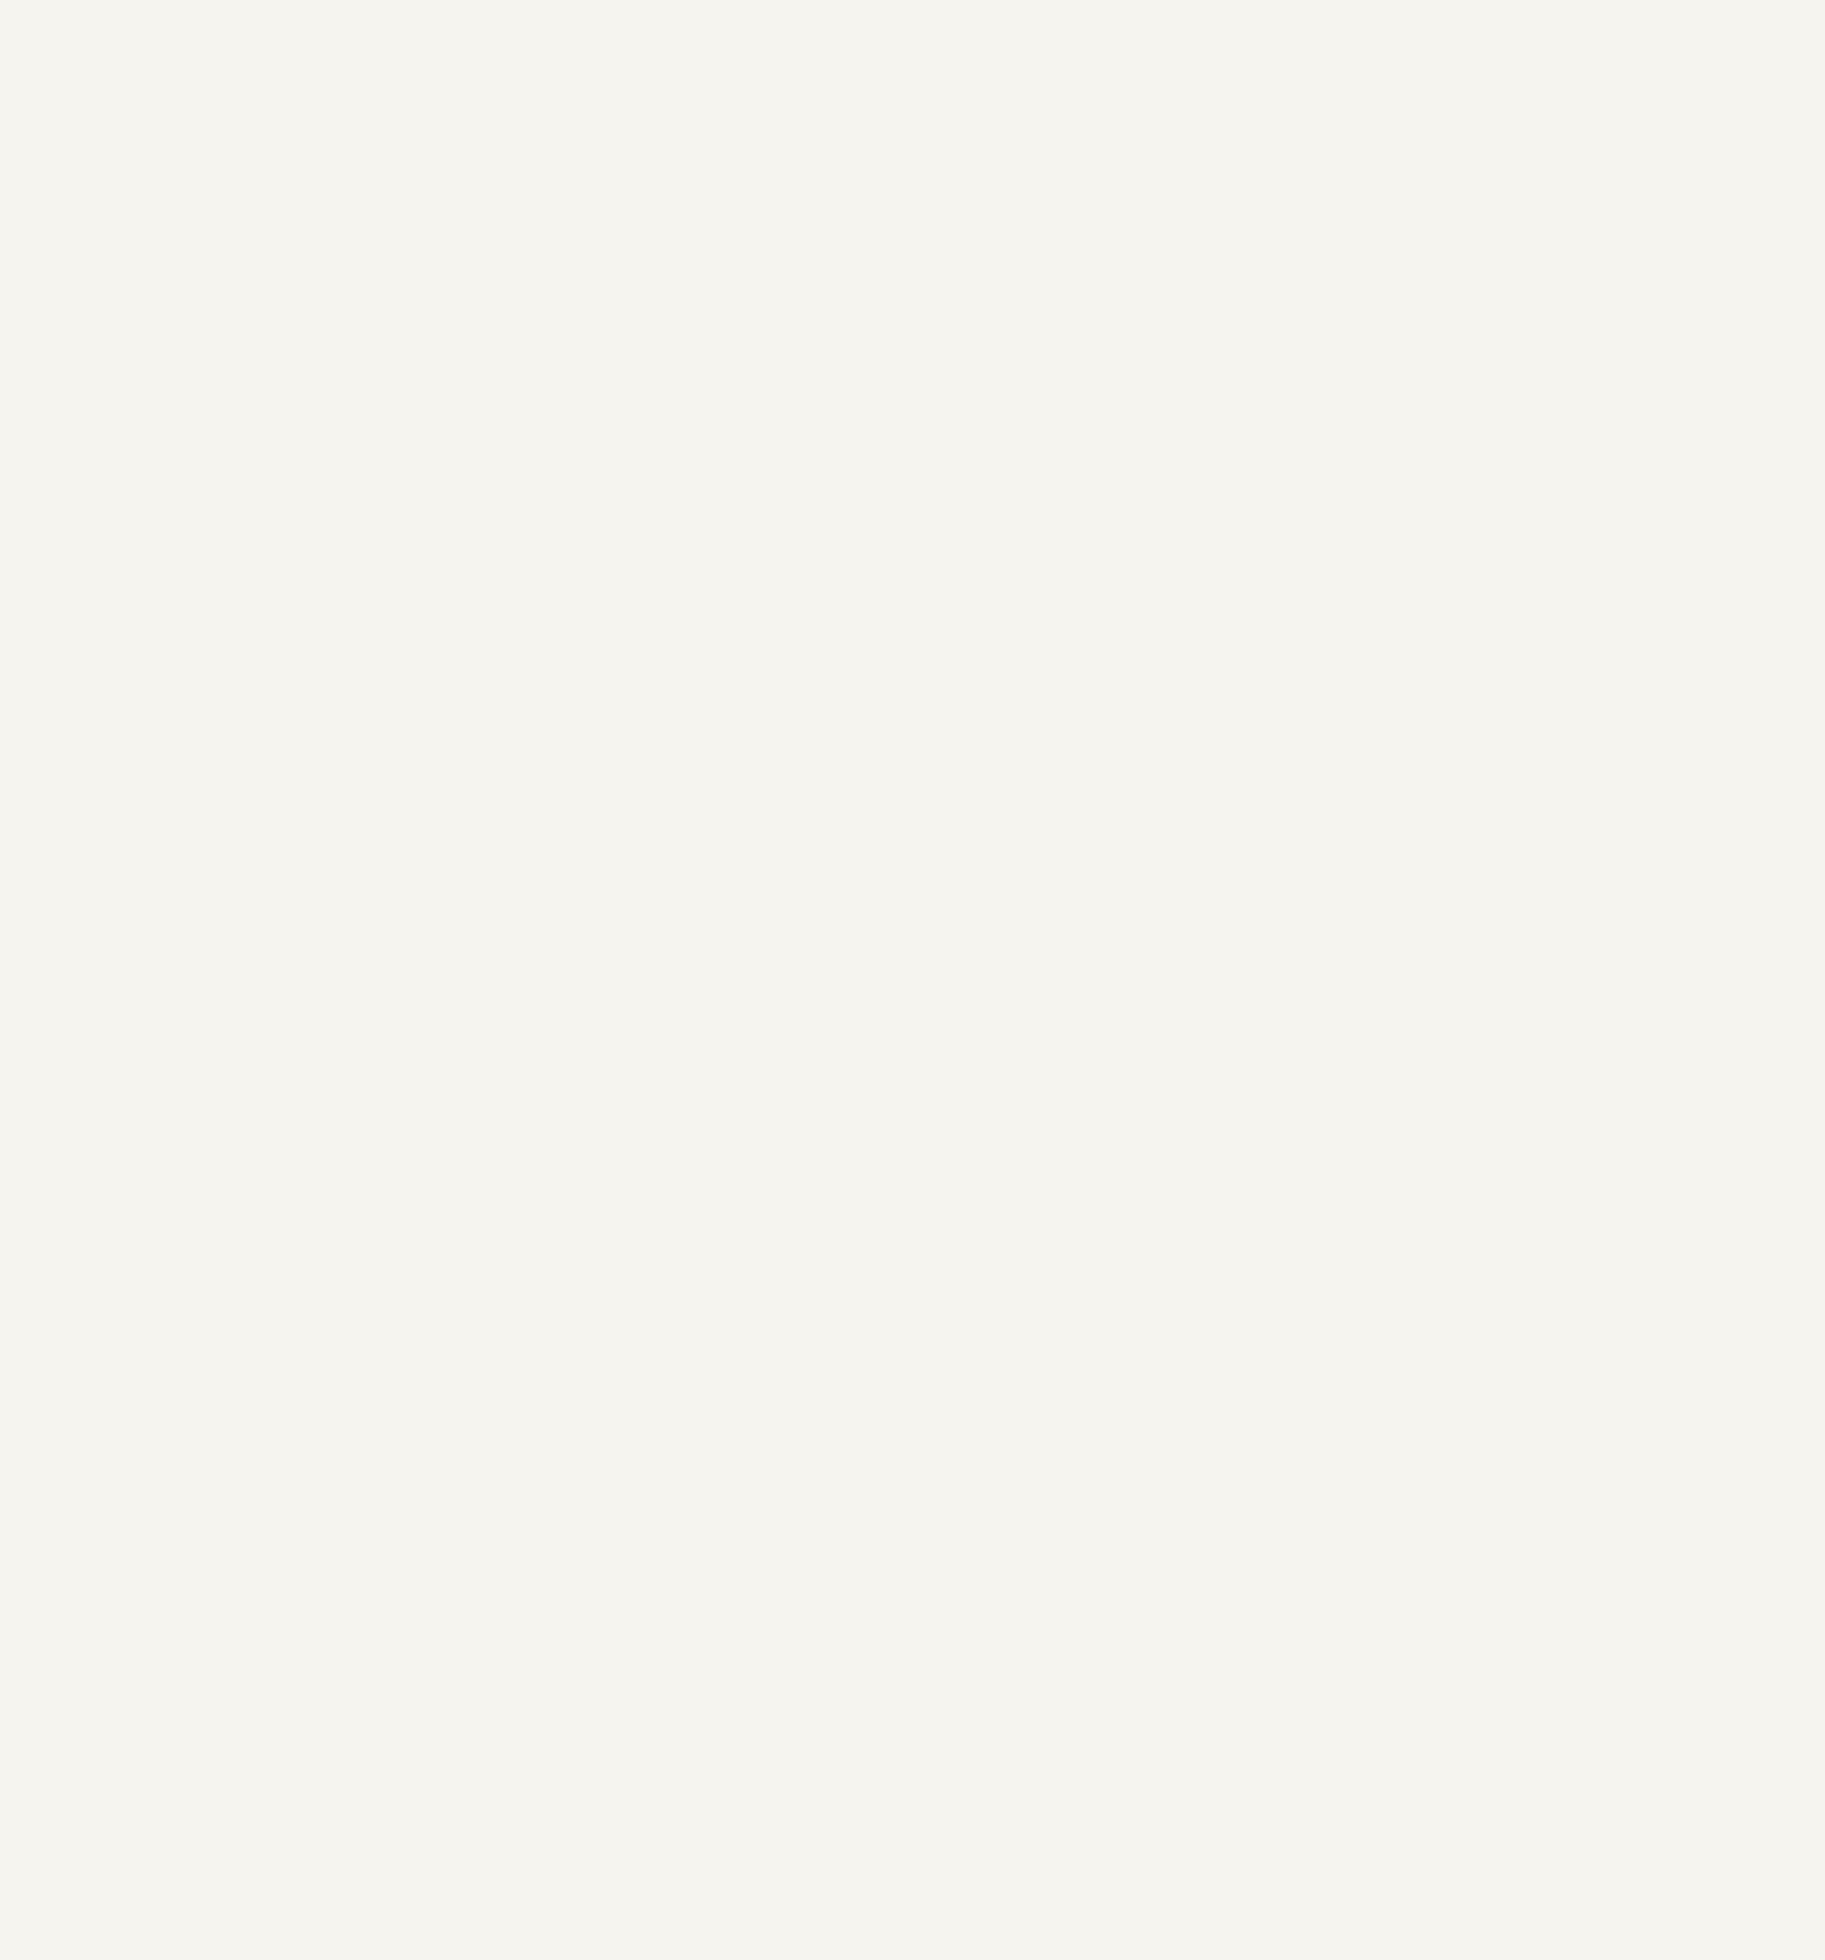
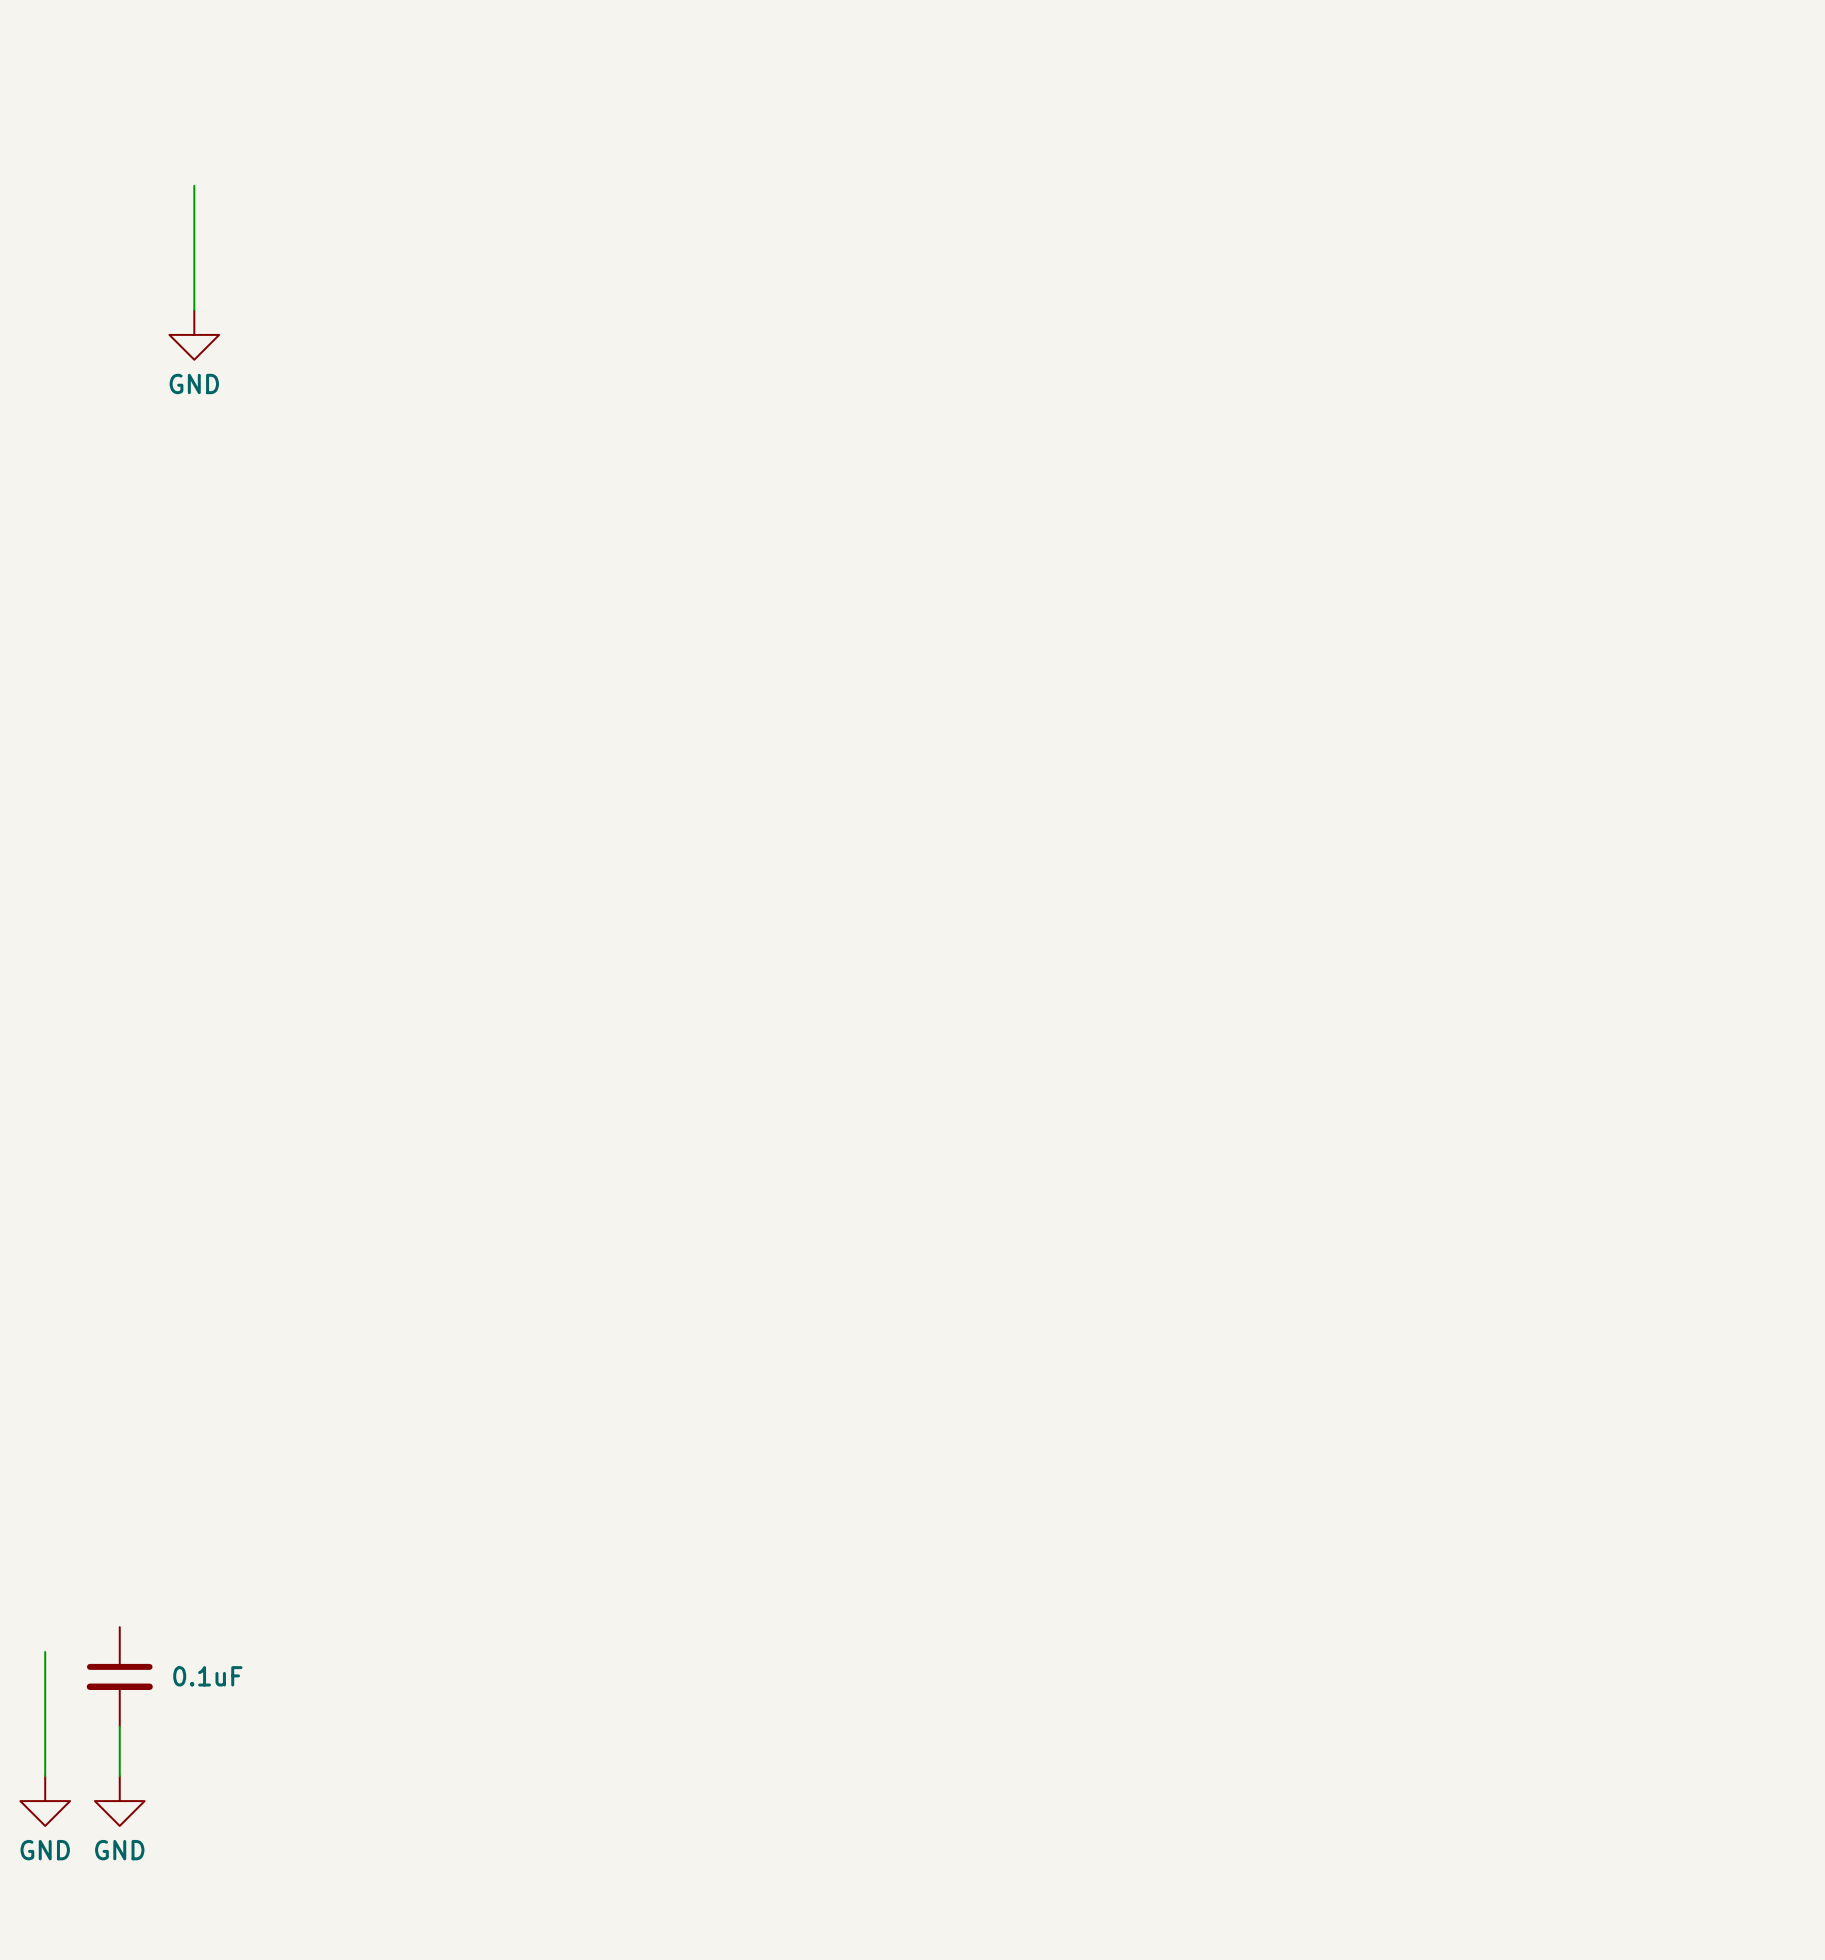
wire: none -> (194, 185) (194, 310)
power symbol: none -> GND (194, 334)
wire: none -> (45, 1651) (45, 1776)
part: none -> 0.1uF (119, 1676)
wire: none -> (119, 1726) (119, 1776)
power symbol: none -> GND (45, 1801)
power symbol: none -> GND (119, 1801)

